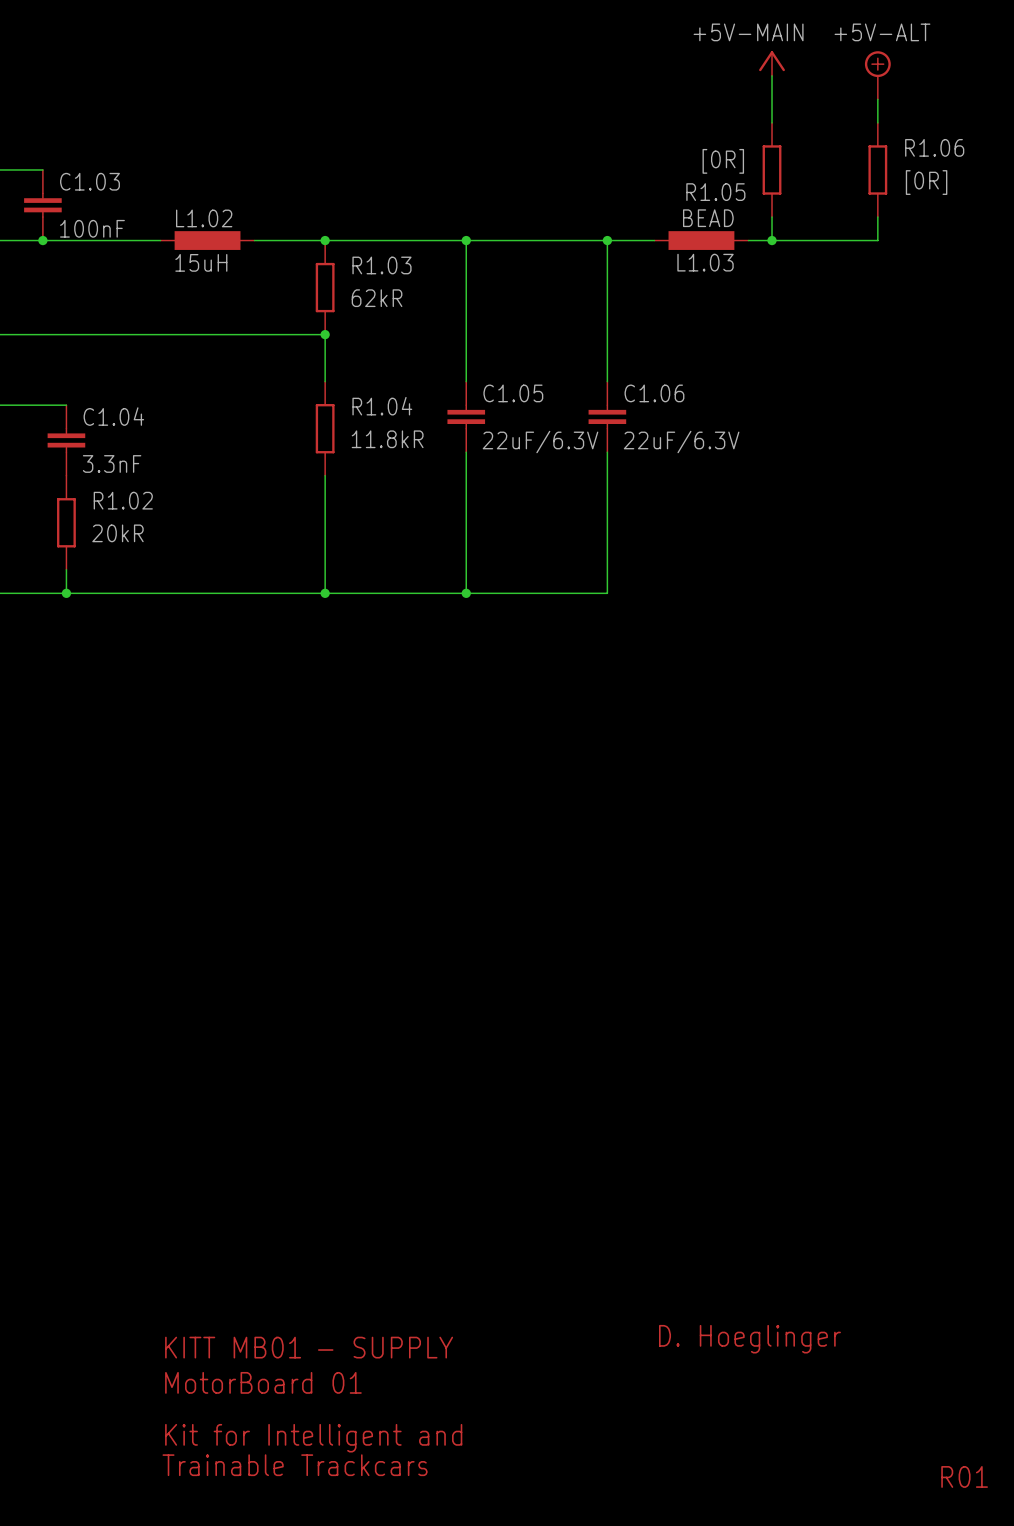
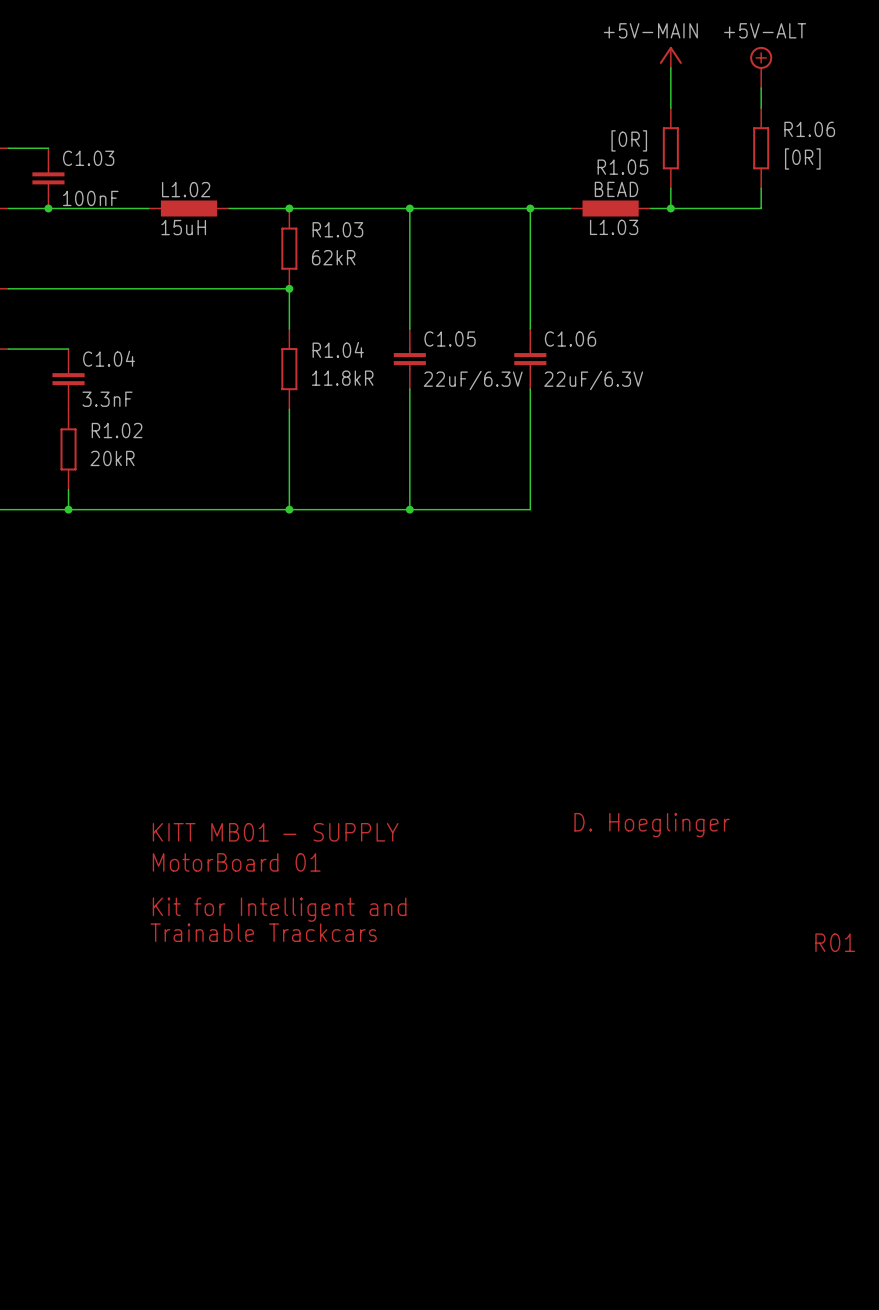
text: none -> D. Hoeglinger (652, 825)
text: none -> KITT MB01 (210, 832)
text: none -> - SUPPLY (340, 832)
text: none -> MotorBoard 01 (236, 862)
text: none -> Kit for Intelligent and (279, 909)
text: none -> Trainable Trackcars (263, 932)
text: none -> R01 (835, 942)
text: D. Hoeglinger (749, 1339) -> none
text: KITT MB01 (233, 1347) -> none
text: - SUPPLY (385, 1347) -> none
text: MotorBoard 01 (263, 1382) -> none
text: Kit for Intelligent and (313, 1438) -> none
text: Trainable Trackcars (295, 1465) -> none
text: R01 (964, 1476) -> none

